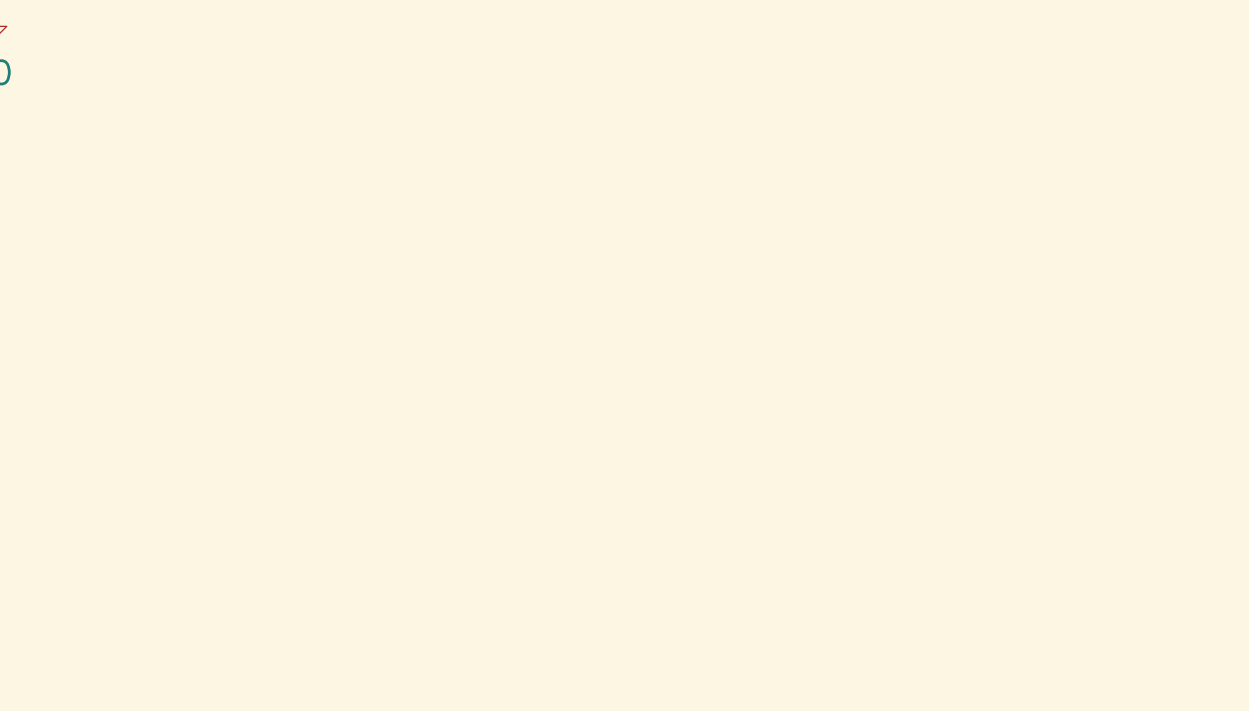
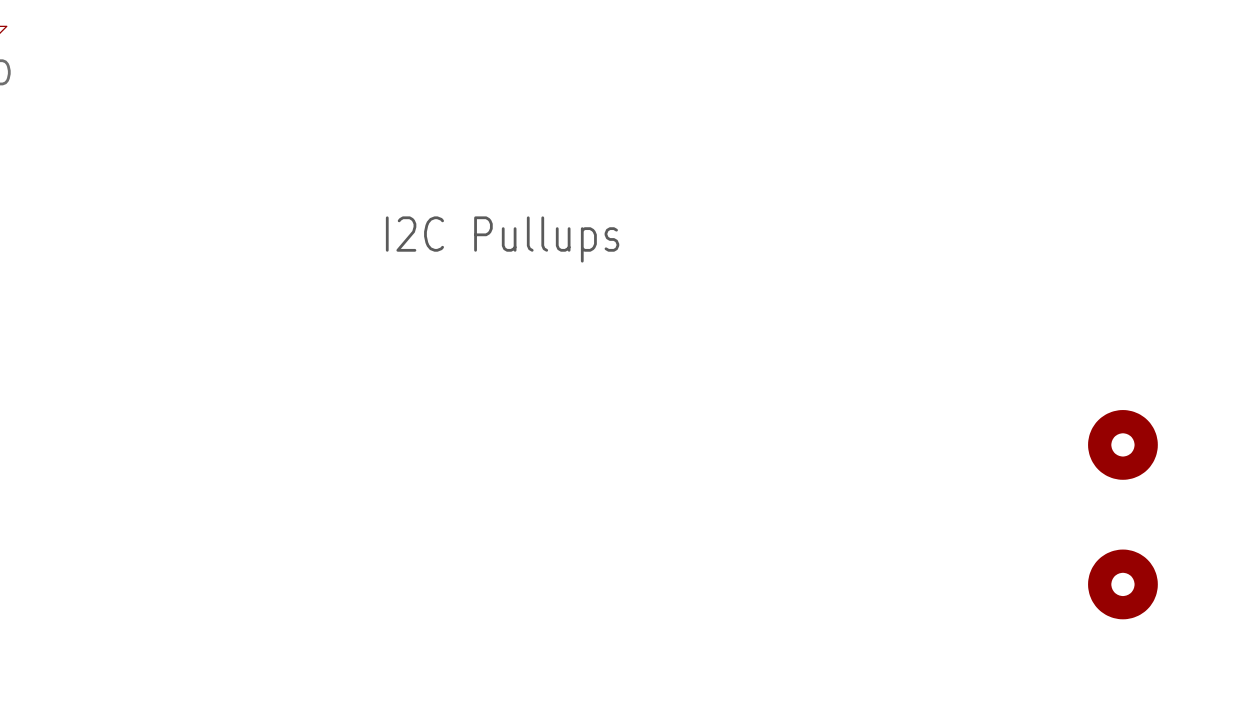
text: none -> I2C Pullups (502, 239)
part: none -> (1122, 444)
part: none -> (1122, 584)

